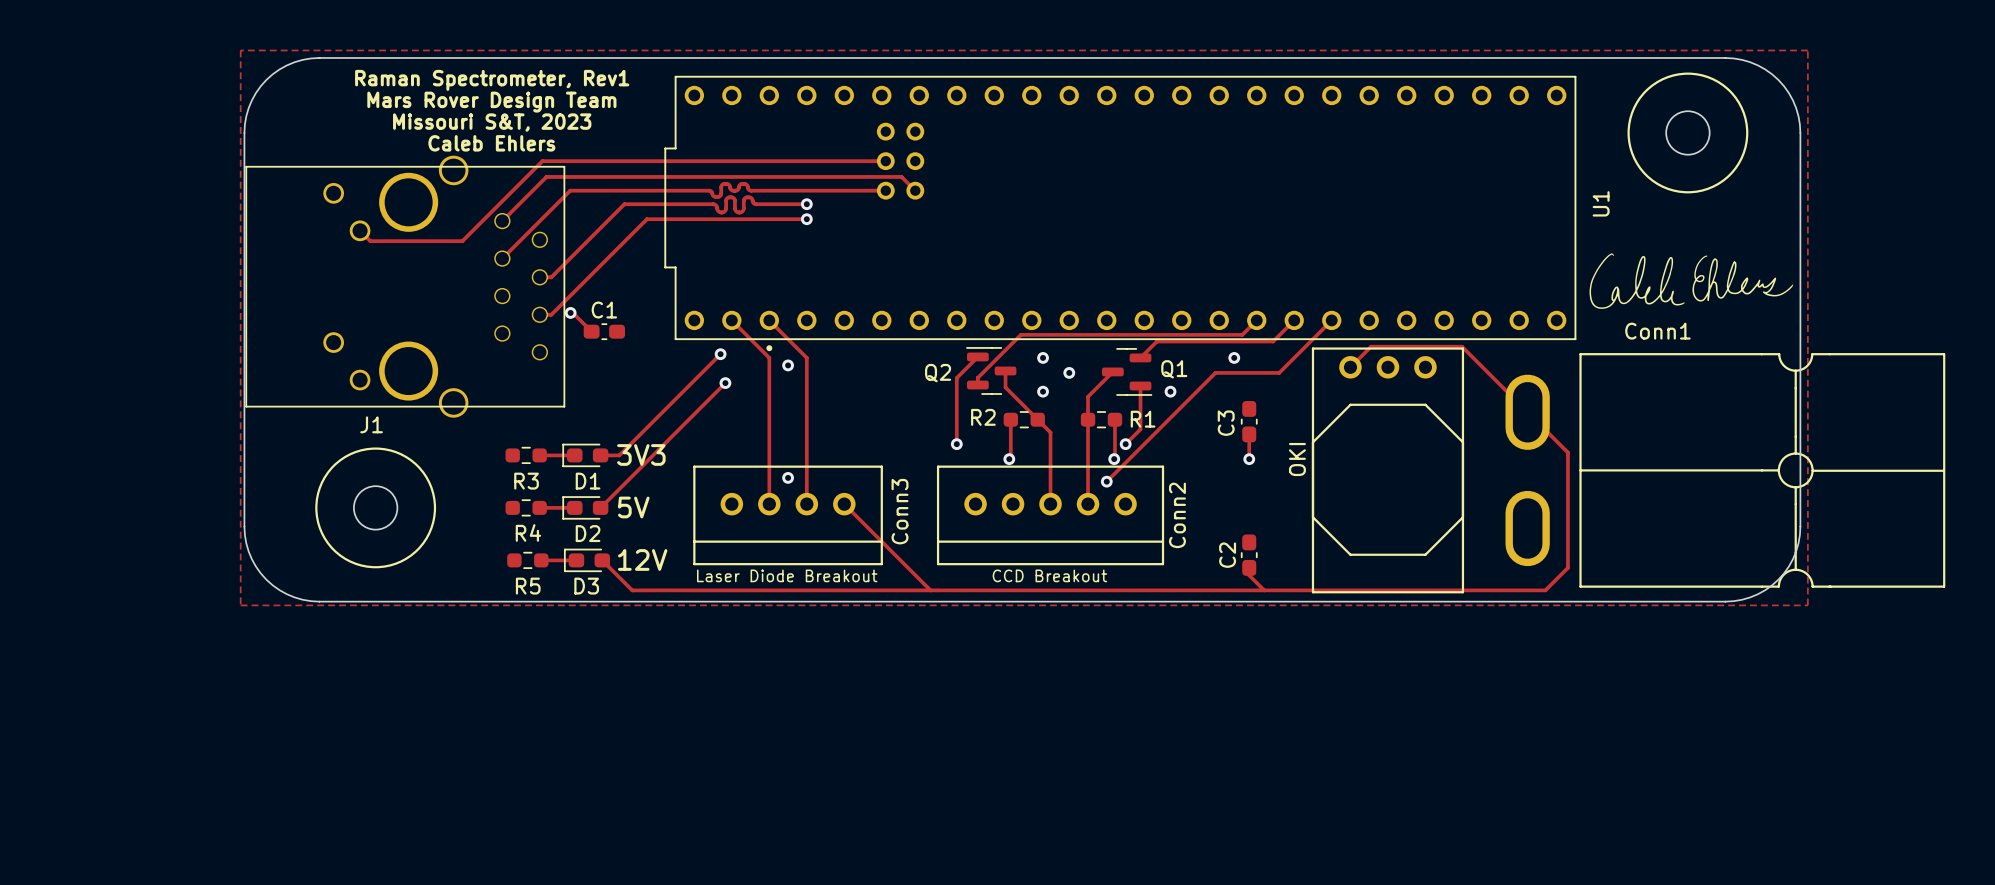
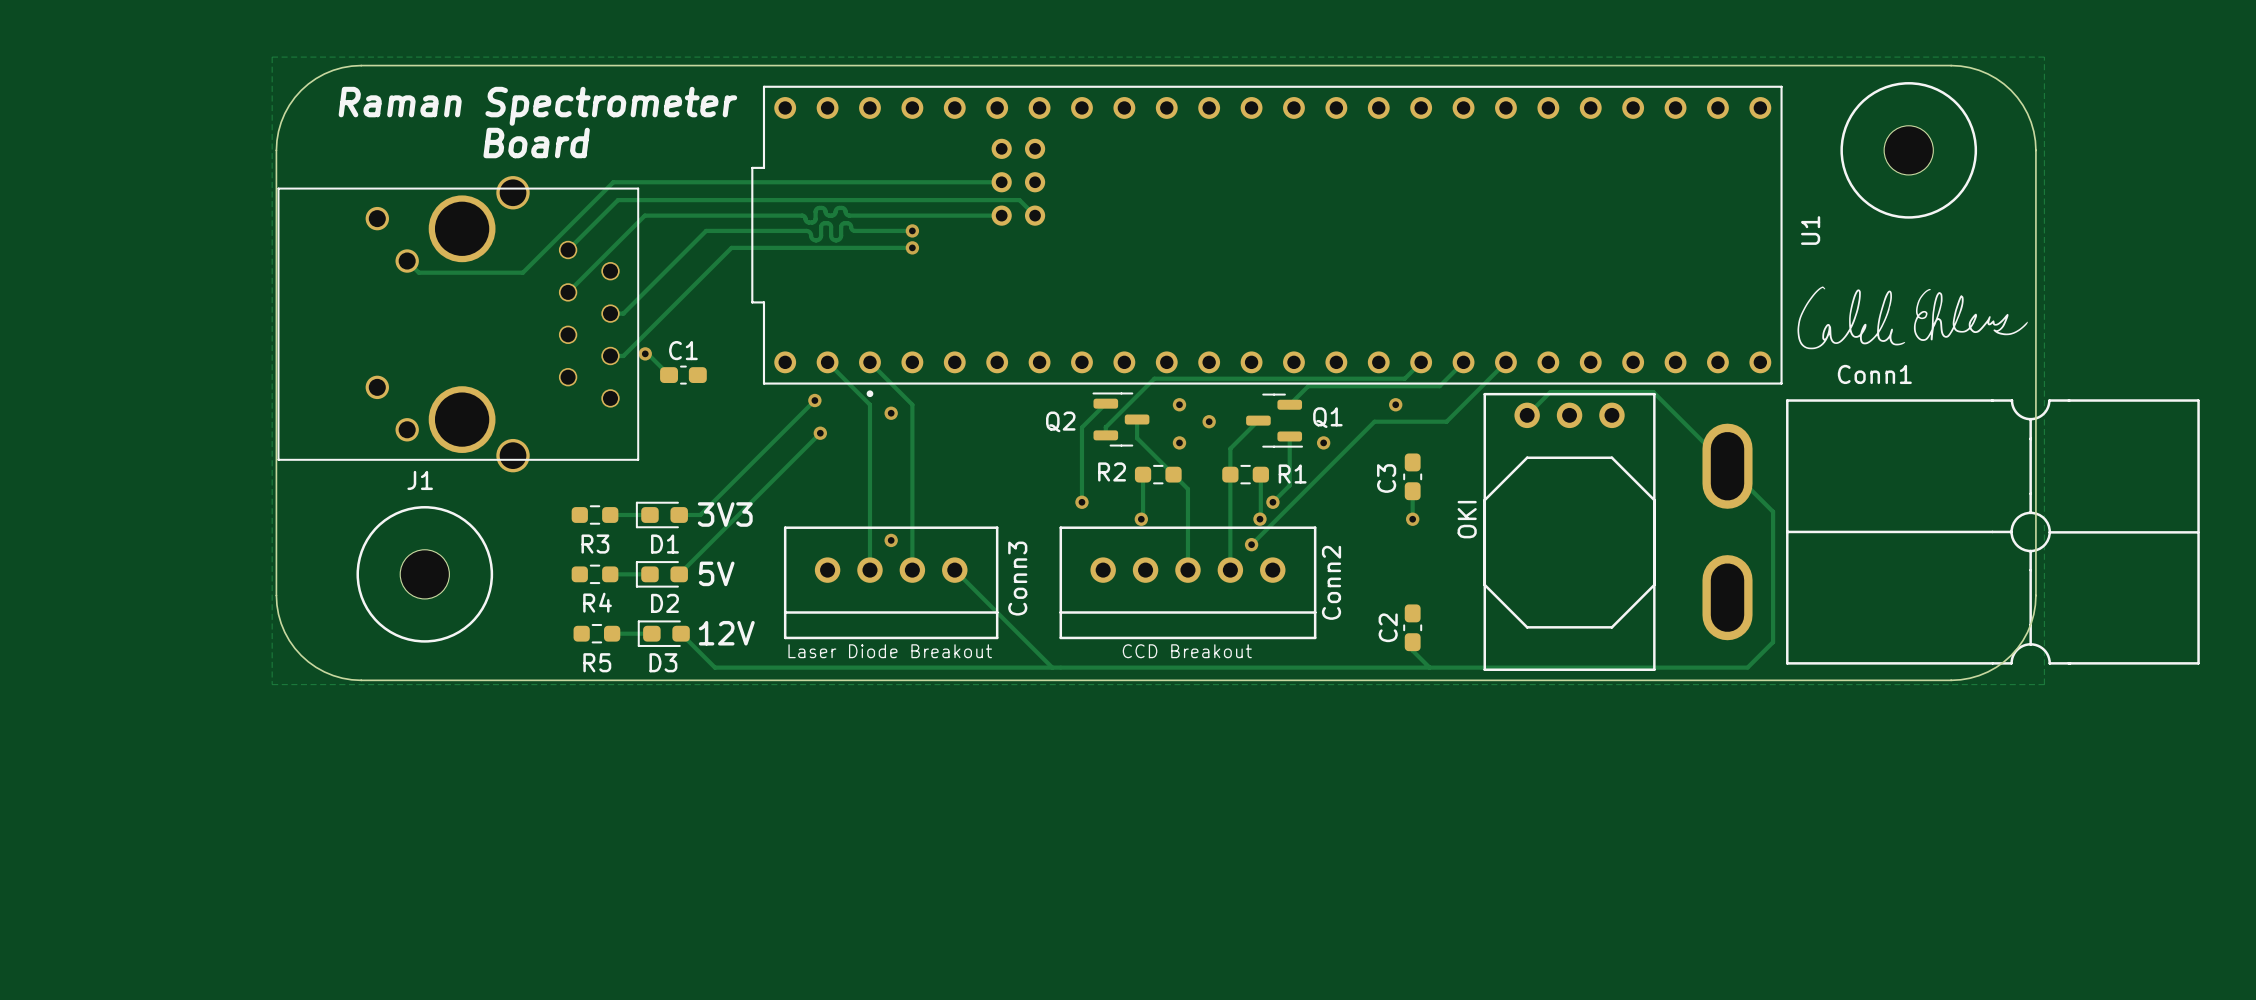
text: Raman Spectrometer, Rev1 (492, 80) -> Raman Spectrometer (537, 106)
text: Mars Rover Design Team (491, 102) -> none
text: Missouri S&T, 2023 (492, 122) -> none
text: none -> Board (536, 143)
text: Caleb Ehlers (491, 143) -> none

